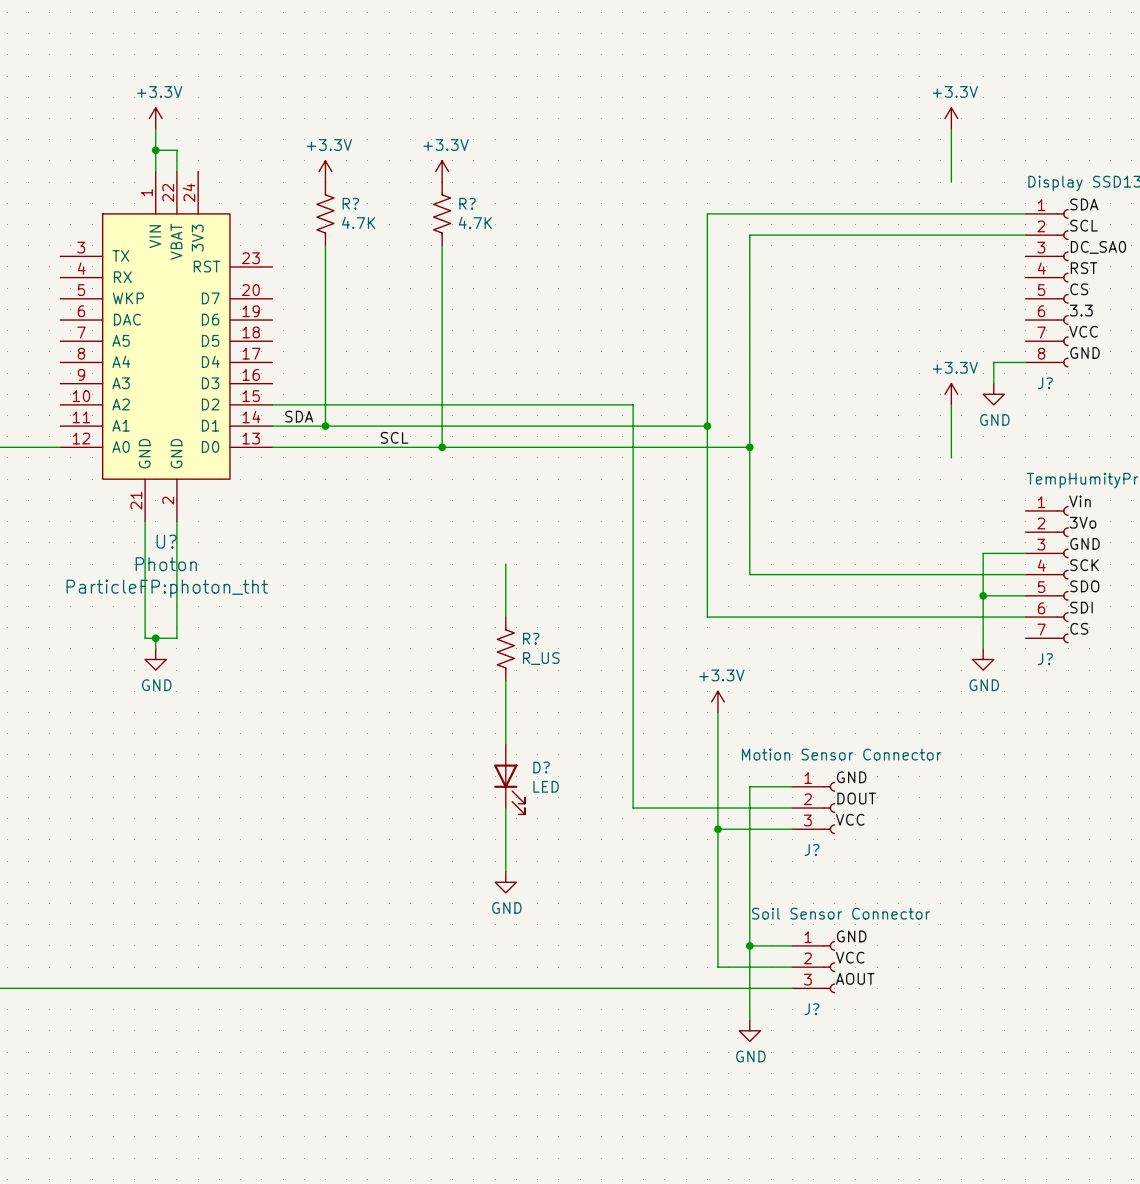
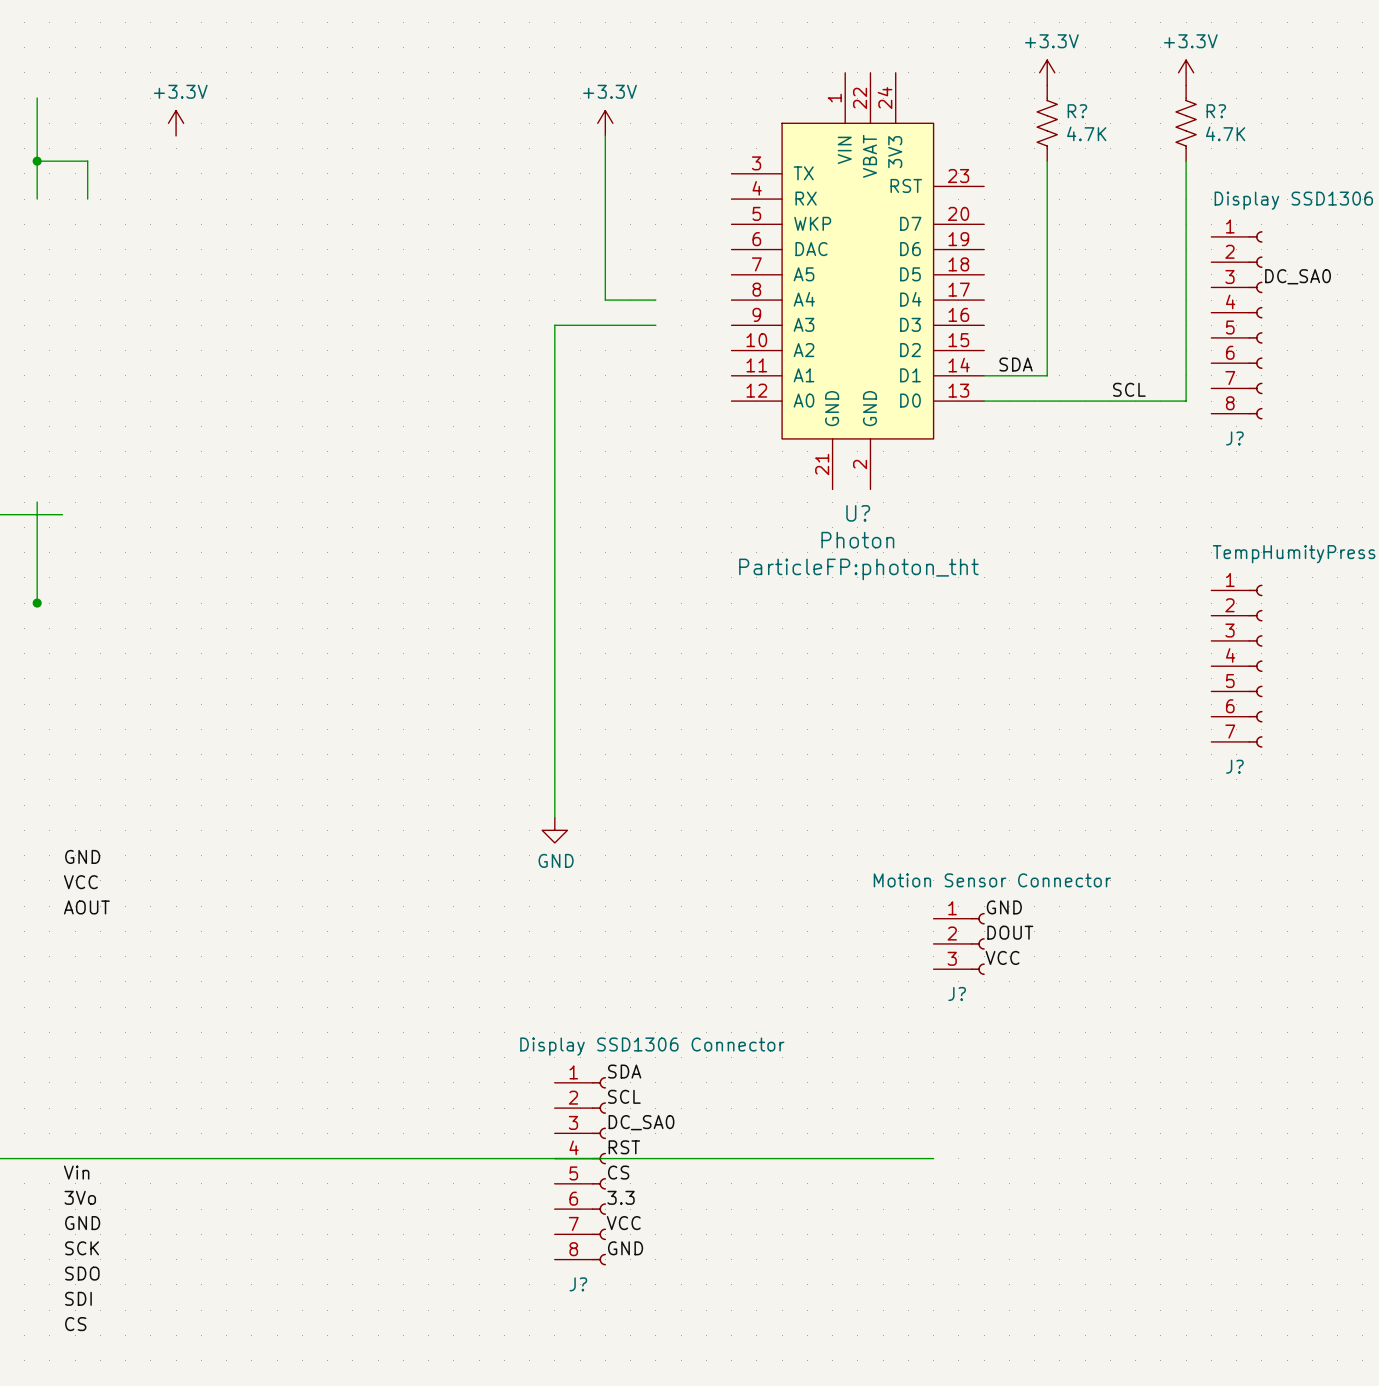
power symbol: none -> +3.3V (1047, 72)
power symbol: none -> +3.3V (1186, 72)
wire: none -> (37, 98) (37, 199)
R?: none -> 4.7K (1047, 123)
power symbol: +3.3V (951, 118) -> none
R?: none -> 4.7K (1186, 123)
wire: (155, 129) (155, 171) -> none
wire: none -> (605, 135) (605, 300) (655, 300)
wire: (951, 129) (951, 182) -> none
wire: none -> (37, 161) (87, 161) (87, 199)
junction: none -> (37, 161)
wire: (155, 150) (176, 150) (176, 171) -> none
junction: (155, 150) -> none
wire: none -> (1047, 161) (1047, 375) (984, 375)
wire: none -> (1186, 161) (1186, 401) (984, 401)
power symbol: +3.3V (325, 171) -> none
power symbol position: +3.3V (442, 171) -> +3.3V (605, 123)
label: SDA (1084, 204) -> none
R?: 4.7K (325, 213) -> none
R?: 4.7K (442, 213) -> none
wire: (1025, 213) (707, 213) (707, 617) (1025, 617) -> none
label position: SCL (1084, 225) -> SCL (1129, 389)
wire: (1025, 235) (749, 235) (749, 574) (1025, 574) -> none
wire: (325, 245) (325, 426) -> none
wire: (442, 245) (442, 447) -> none
U?: none -> Photon (857, 281)
label: RST (1084, 268) -> none
wire: none -> (655, 325) (554, 325) (554, 817)
label: CS (1079, 289) -> none
label: 3.3 (1081, 310) -> none
label: none -> SDA (1016, 364)
label: VCC (1083, 331) -> none
U?: Photon (166, 346) -> none
label: GND (1085, 352) -> none
wire: (1025, 362) (993, 362) (993, 383) -> none
power symbol: +3.3V (951, 394) -> none
power symbol: GND (993, 394) -> none
wire: (272, 404) (633, 404) (633, 808) (792, 808) -> none
wire: (951, 404) (951, 457) -> none
label: SDA (299, 416) -> none
wire: (272, 426) (707, 426) -> none
junction: (325, 426) -> none
junction: (707, 426) -> none
wire: none -> (37, 502) (37, 603)
label: SCL (394, 437) -> none
wire: (272, 447) (749, 447) -> none
junction: (442, 447) -> none
junction: (749, 447) -> none
label: Vin (1080, 501) -> none
junction: none -> (37, 603)
wire: (145, 521) (145, 638) (176, 638) (176, 521) -> none
label: 3Vo (1083, 522) -> none
label: GND (1085, 543) -> none
wire: (1025, 553) (983, 553) (983, 648) -> none
wire: (505, 564) (505, 617) -> none
label: SCK (1084, 565) -> none
label: SDO (1084, 586) -> none
wire: (983, 595) (1025, 595) -> none
junction: (983, 595) -> none
label: SDI (1081, 607) -> none
label: CS (1079, 628) -> none
wire: (155, 638) (155, 648) -> none
junction: (155, 638) -> none
R?: R_US (505, 648) -> none
power symbol: GND (155, 659) -> none
power symbol: GND (983, 659) -> none
wire: (505, 680) (505, 744) -> none
power symbol: +3.3V (717, 701) -> none
power symbol: none -> GND (554, 830)
wire: (717, 712) (717, 967) (792, 967) -> none
label: none -> GND (82, 856)
label: none -> VCC (80, 882)
label: none -> AOUT (86, 907)
D?: LED (509, 779) -> none
wire: (792, 786) (749, 786) (749, 1020) -> none
wire: (505, 808) (505, 871) -> none
wire: (717, 829) (792, 829) -> none
junction: (717, 829) -> none
power symbol: GND (505, 882) -> none
label: none -> SDA (624, 1071)
label: none -> SCL (624, 1096)
label: GND (851, 936) -> none
wire: (749, 945) (792, 945) -> none
junction: (749, 945) -> none
label: VCC (850, 957) -> none
label: none -> DC_SA0 (641, 1122)
J?: Soil Sensor Connector (813, 967) -> none
label: none -> RST (624, 1147)
label: AOUT (855, 978) -> none
J?: none -> Display SSD1306 Connector (580, 1171)
label: none -> Vin (76, 1172)
label: none -> CS (618, 1172)
label: none -> 3Vo (80, 1197)
label: none -> 3.3 (621, 1197)
power symbol: GND (749, 1030) -> none
label: none -> GND (82, 1223)
label: none -> VCC (623, 1223)
label: none -> SCK (82, 1248)
label: none -> GND (625, 1248)
label: none -> SDO (82, 1273)
label: none -> SDI (78, 1298)
label: none -> CS (75, 1324)

